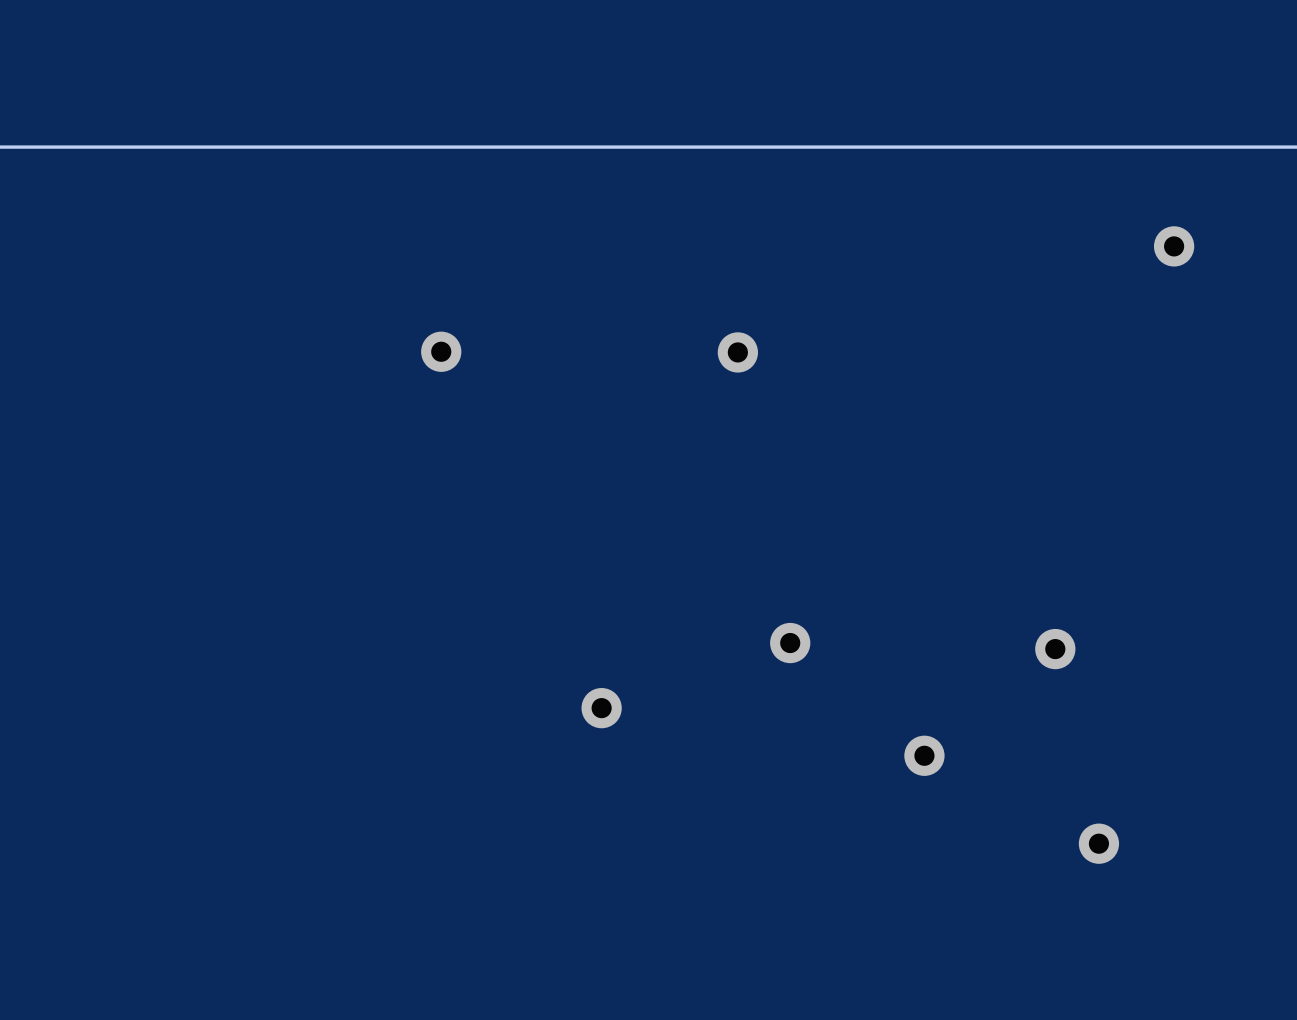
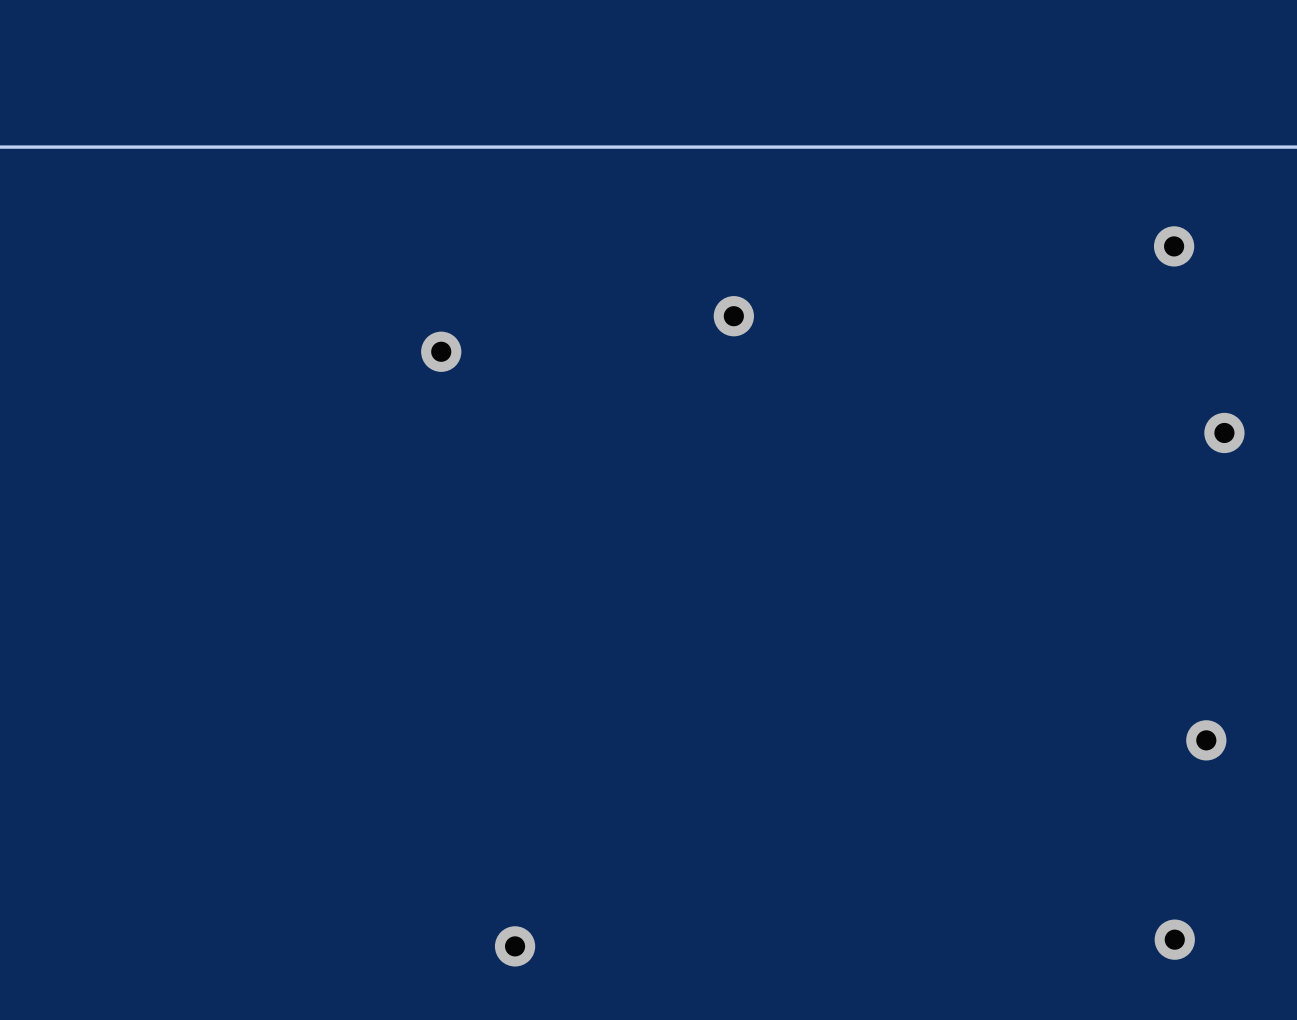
via position: (737, 352) -> (733, 316)
via: none -> (1224, 432)
via: (790, 643) -> none
via: (1055, 649) -> none
via: (601, 708) -> none
via: none -> (1206, 740)
via: (924, 755) -> none
via: (1098, 843) -> none
via: none -> (1174, 939)
via: none -> (515, 946)

